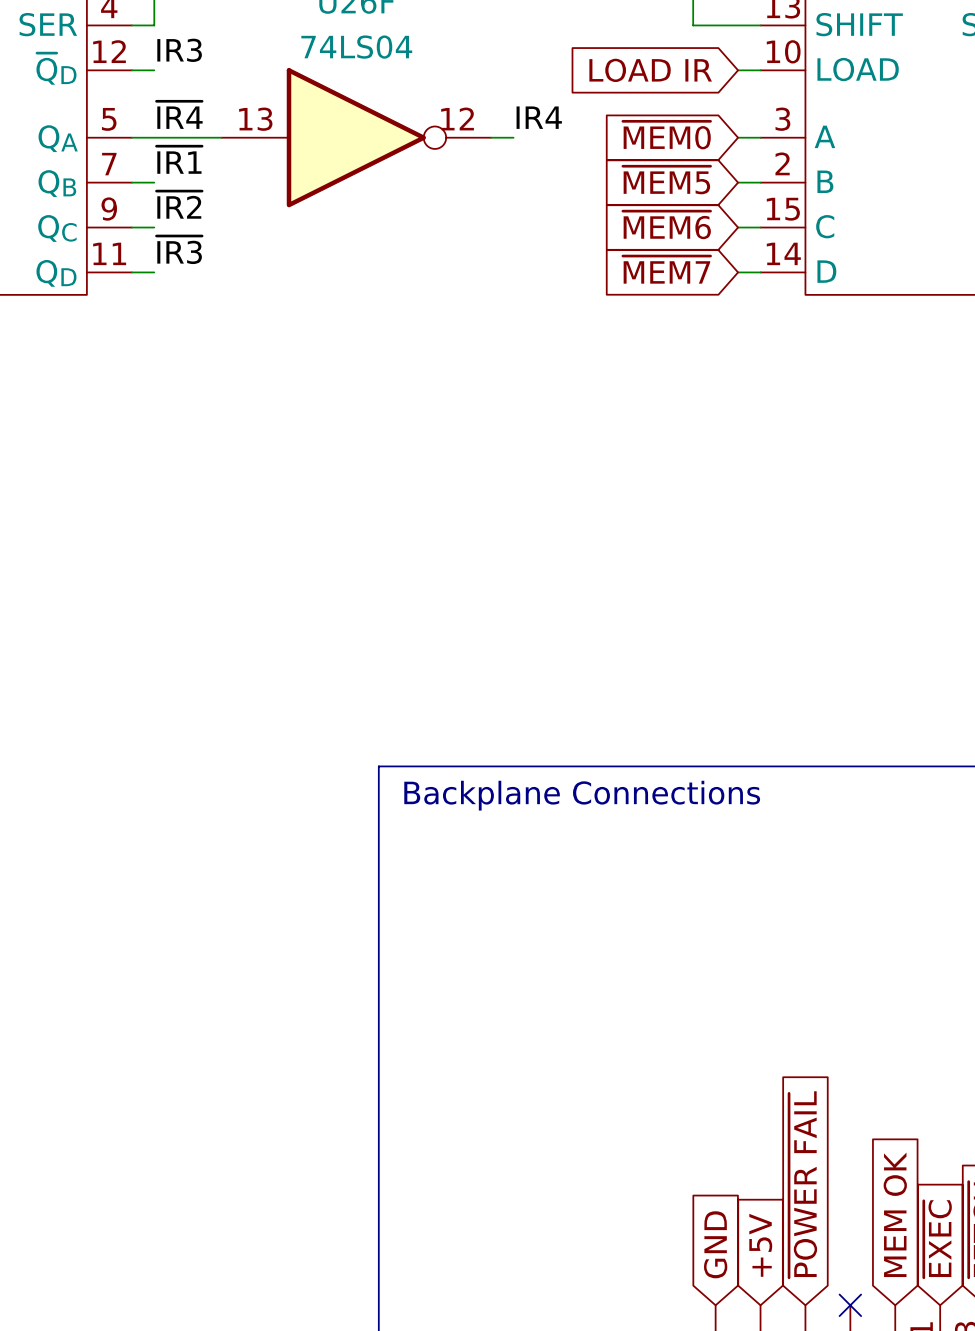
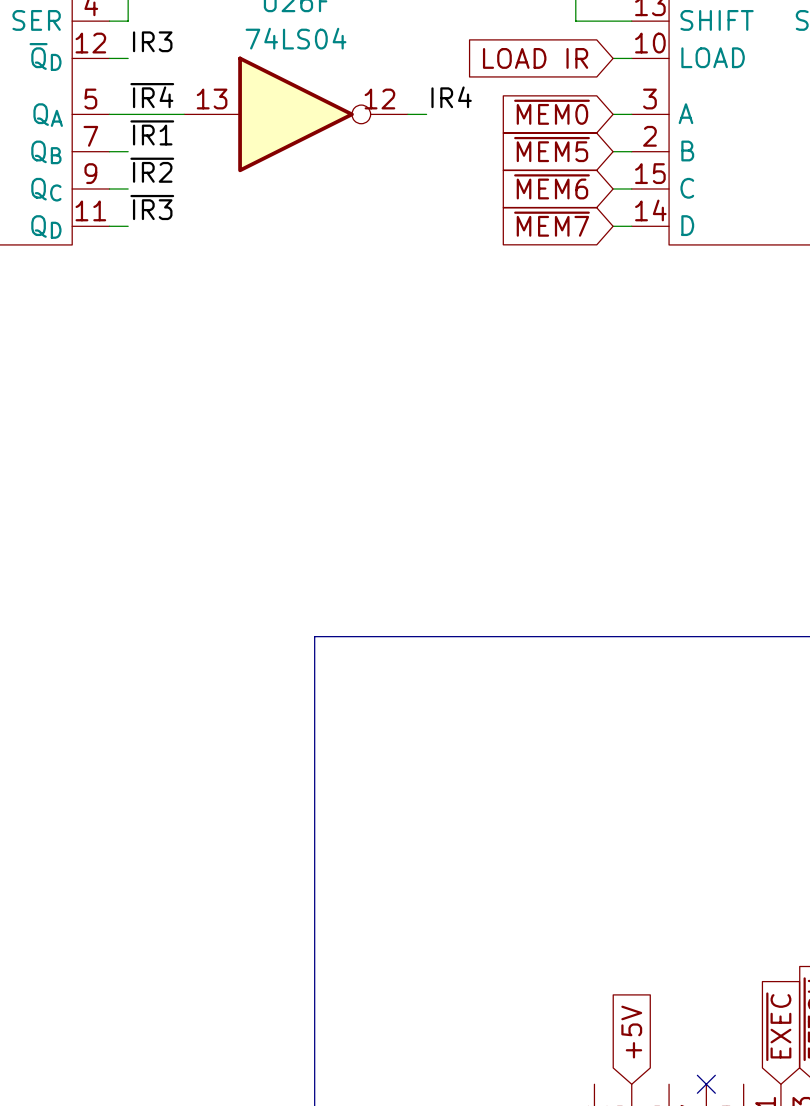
text: Backplane Connections (582, 795) -> none
global label: ~{POWER FAIL} (803, 1184) -> none
global label: MEM OK (895, 1214) -> none
global label: GND (715, 1244) -> none

